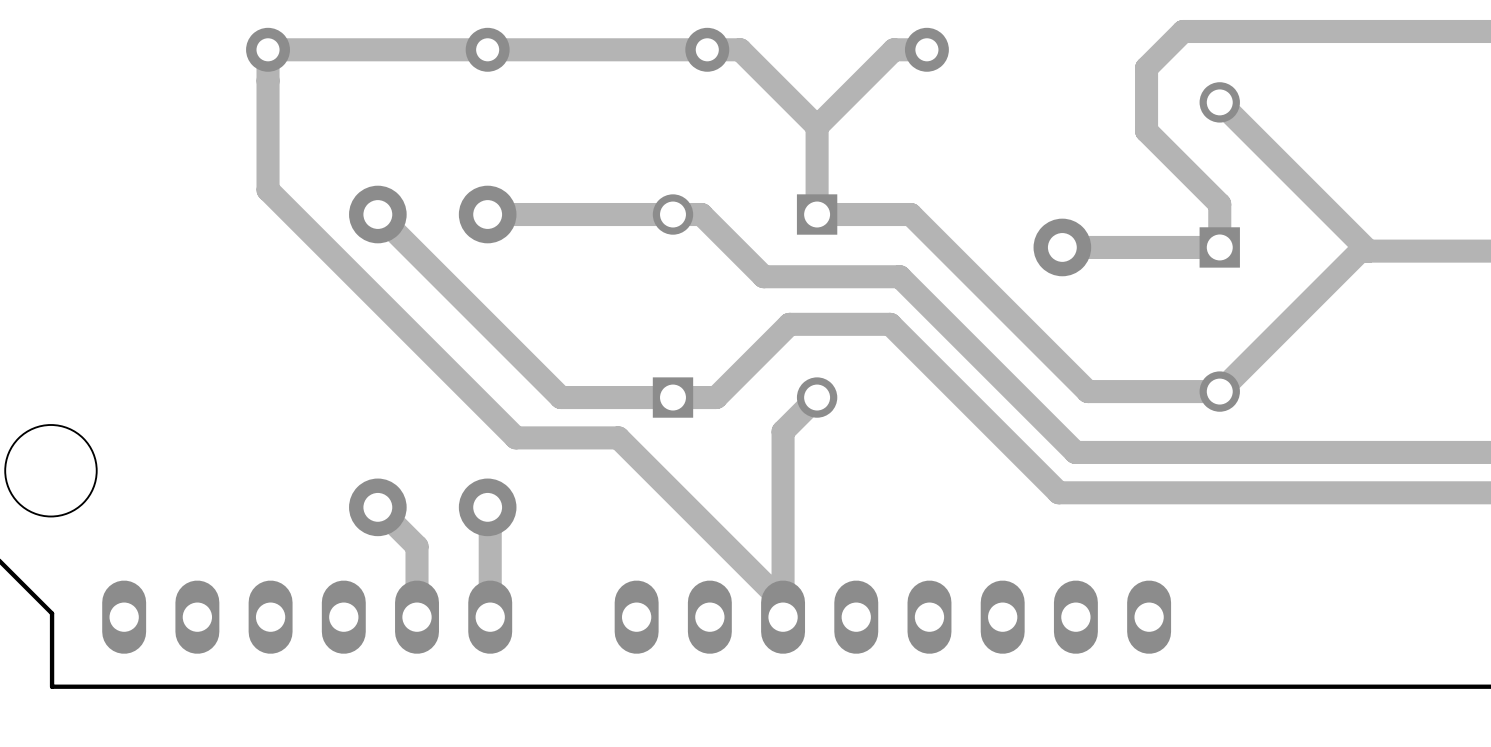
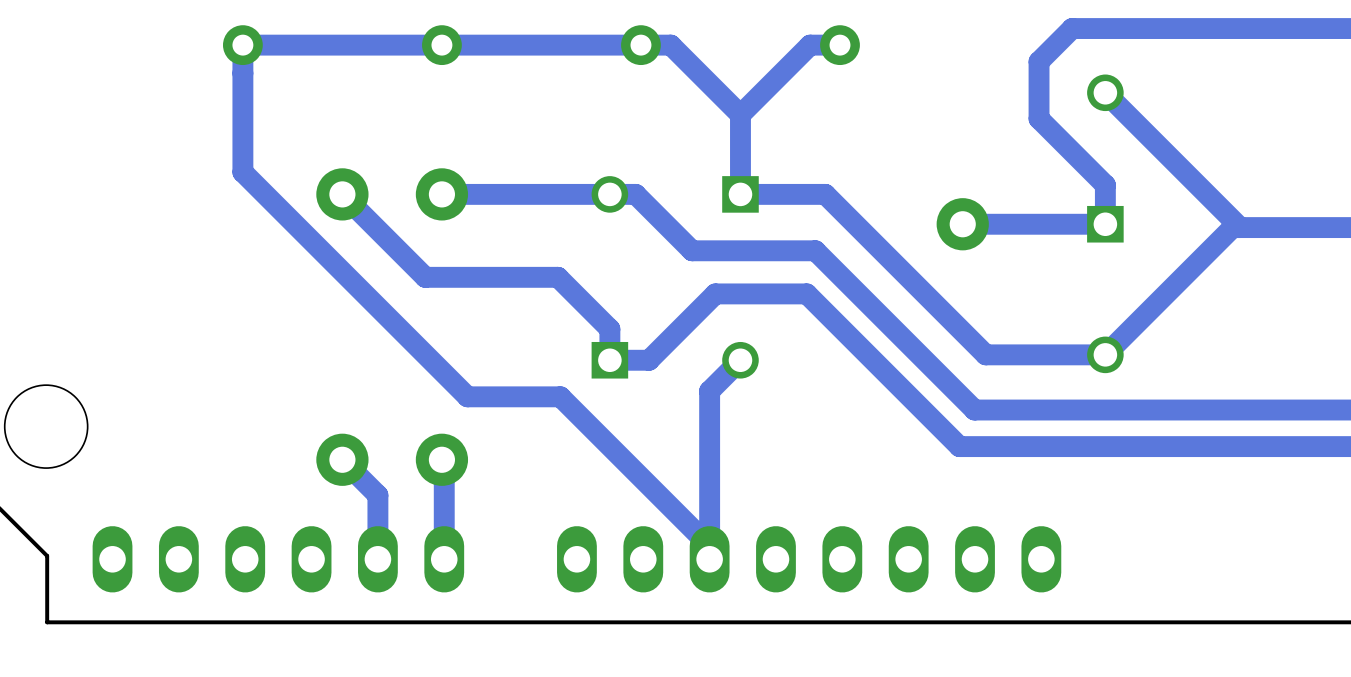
track: (469, 306) (560, 397) (672, 397) -> (425, 277) (558, 277) (609, 329) (609, 360)

